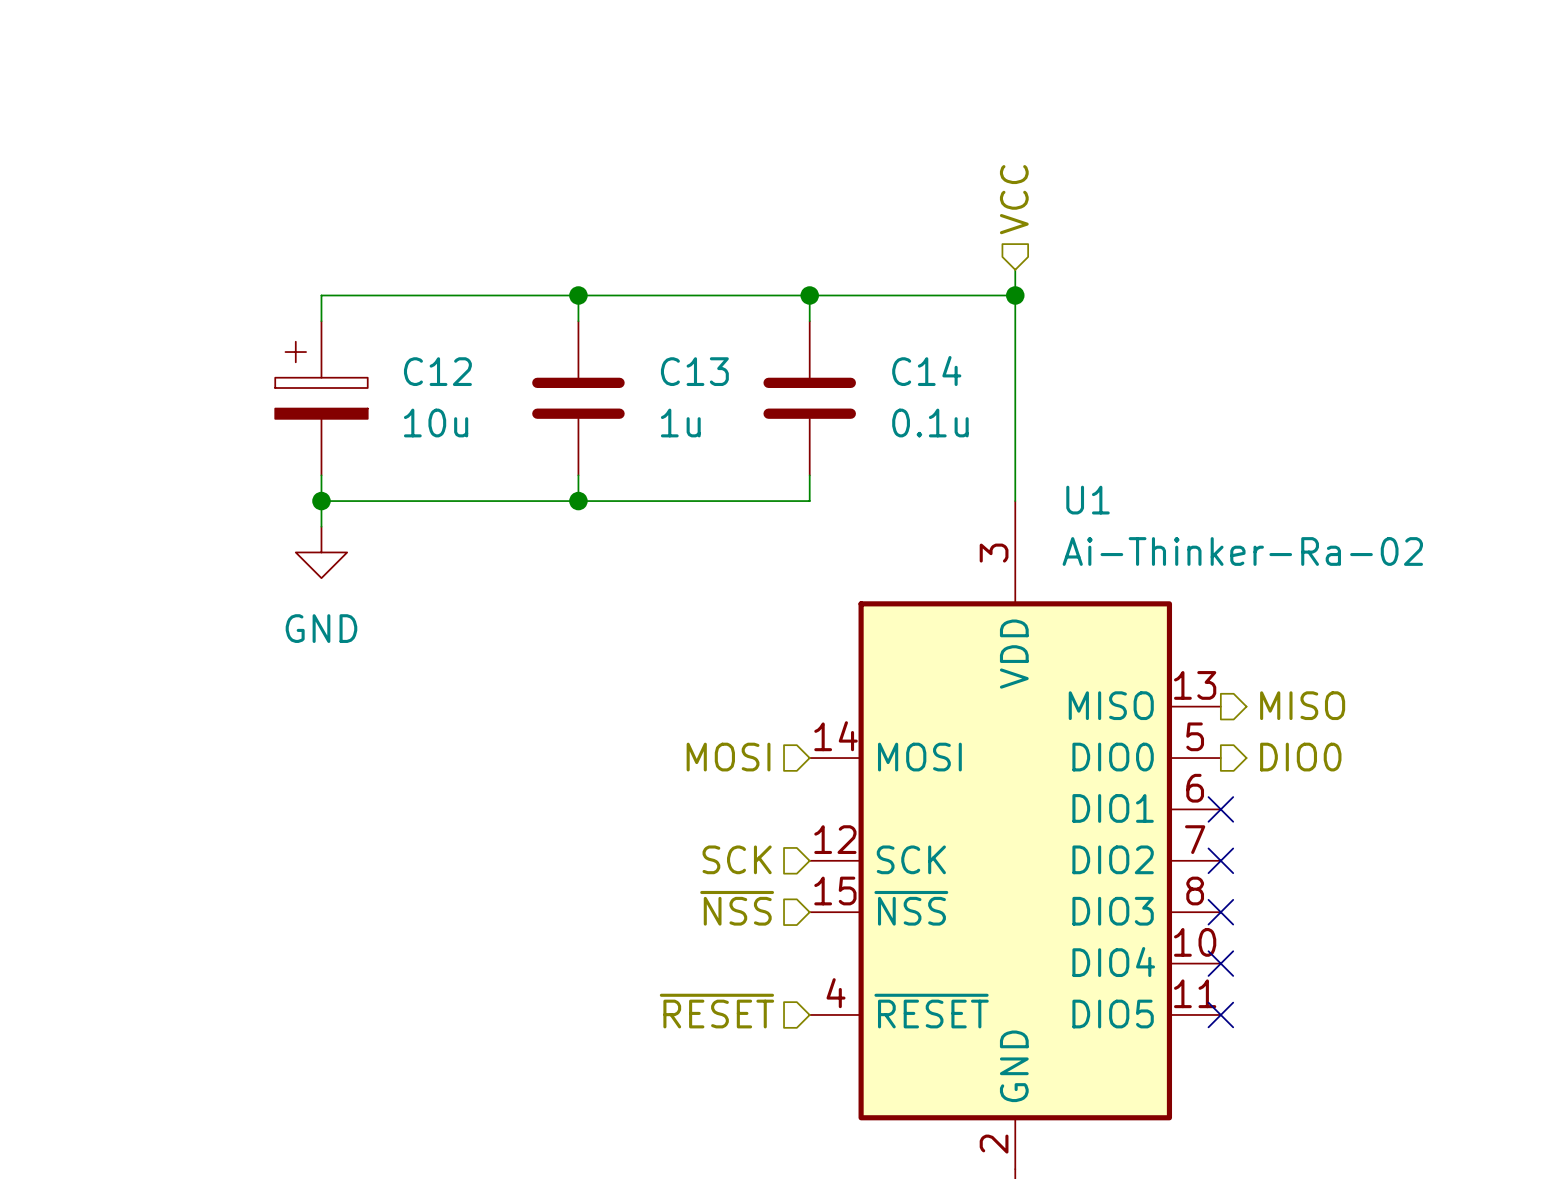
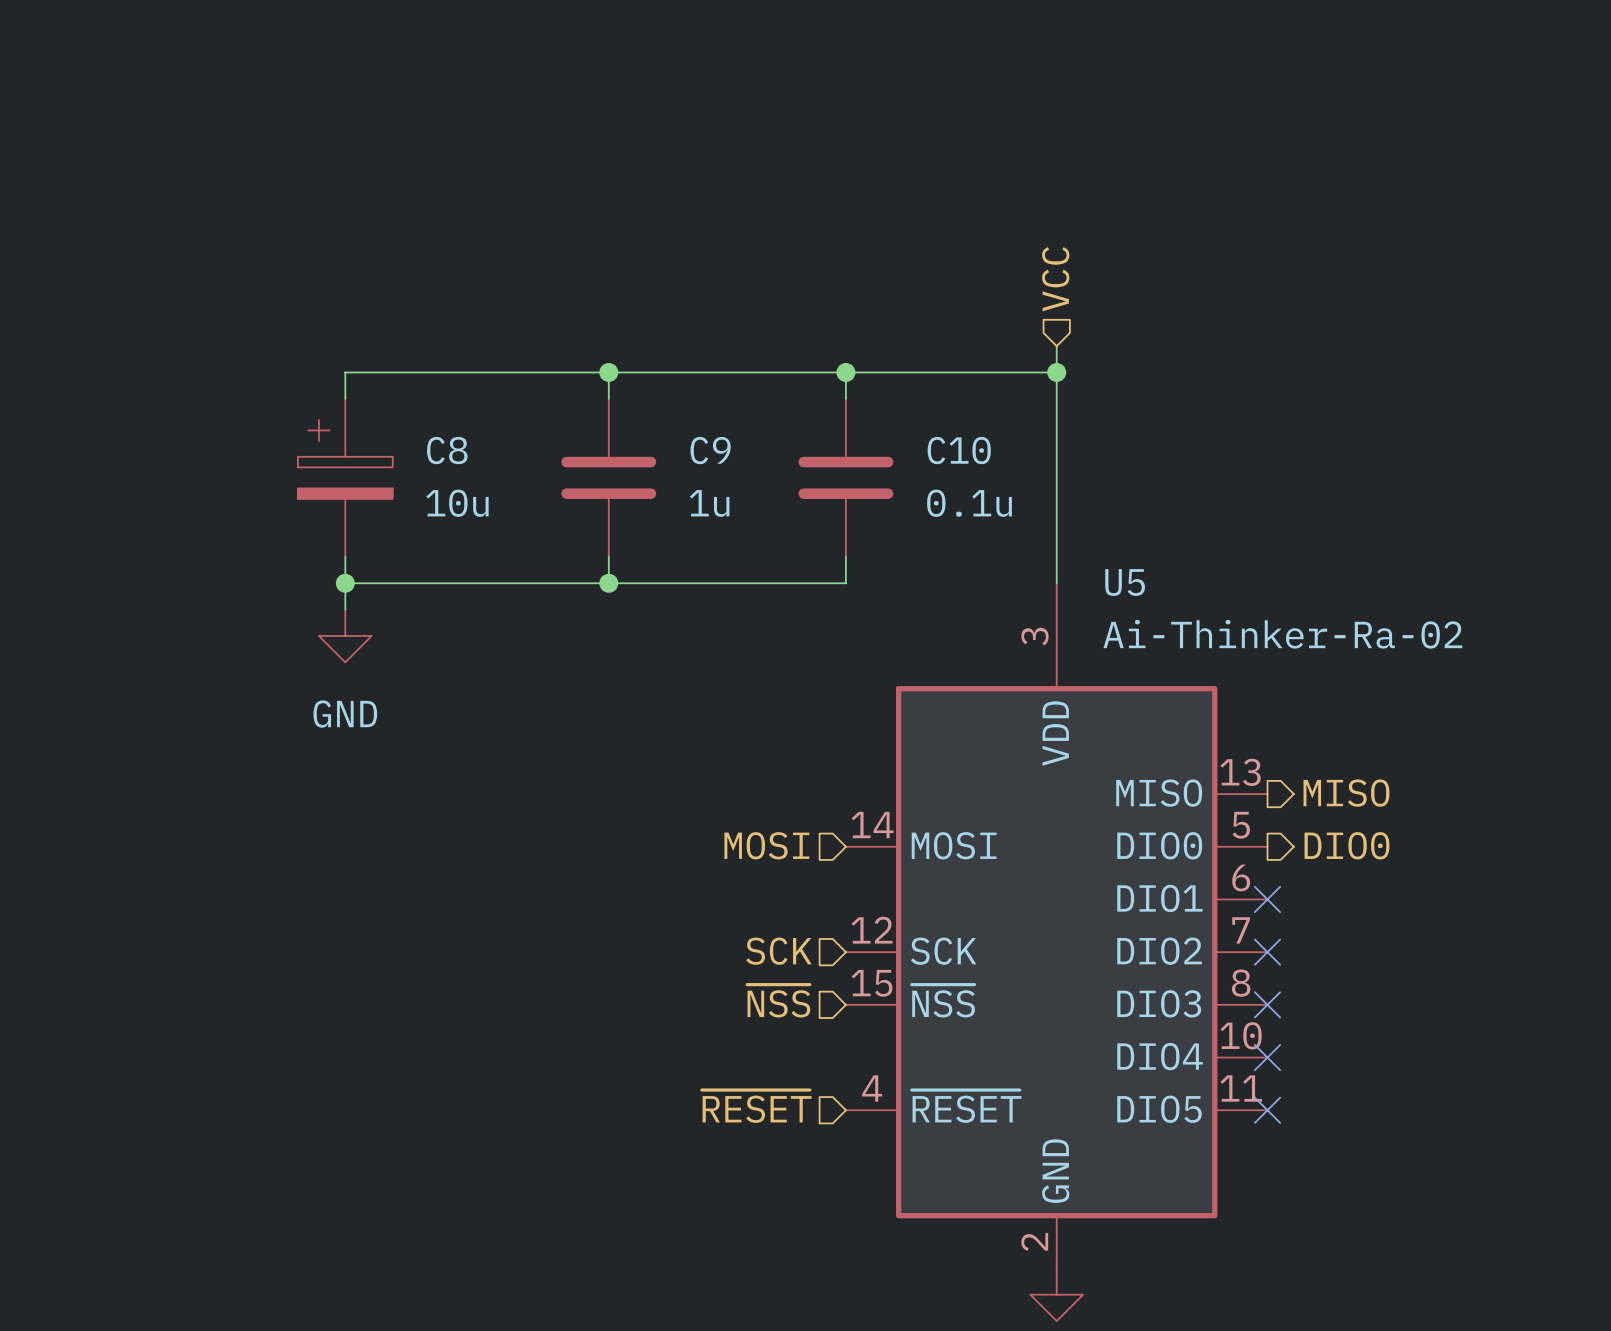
C12 name: C12 (437, 371) -> C8 (447, 450)
C13 name: C13 (694, 371) -> C9 (710, 450)
C14 name: C14 (926, 371) -> C10 (959, 450)
U1 name: U1 (1088, 500) -> U5 (1125, 582)

